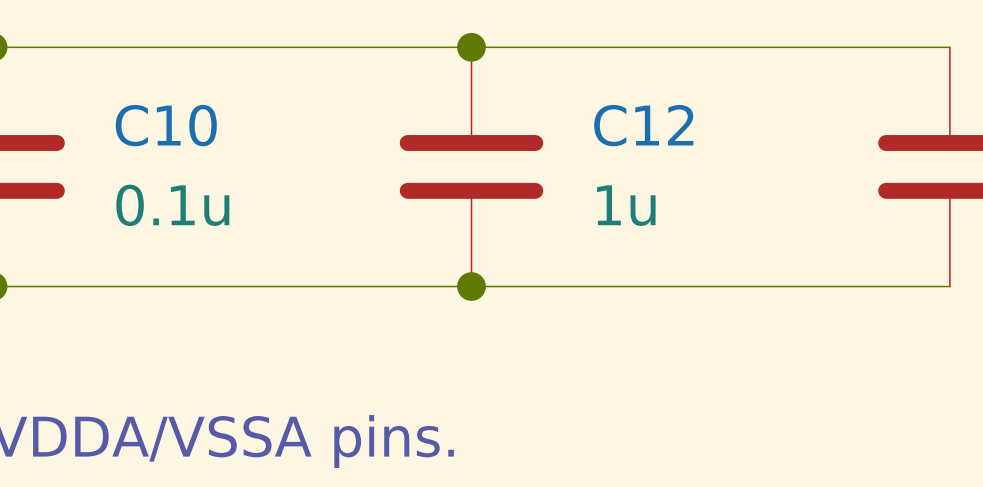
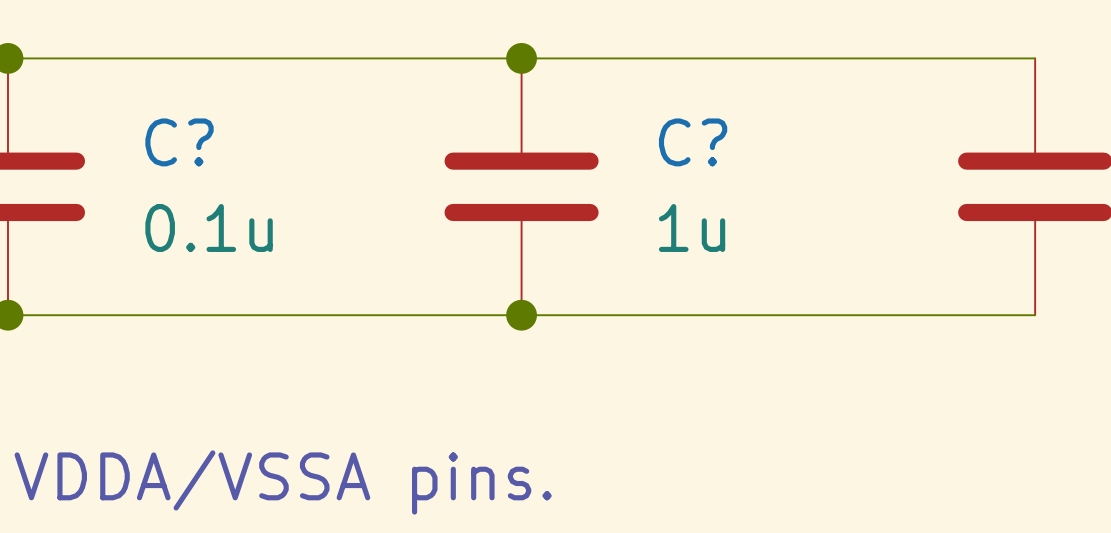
C10 name: C10 (166, 125) -> C? (179, 142)
C12 name: C12 (643, 125) -> C? (693, 142)

